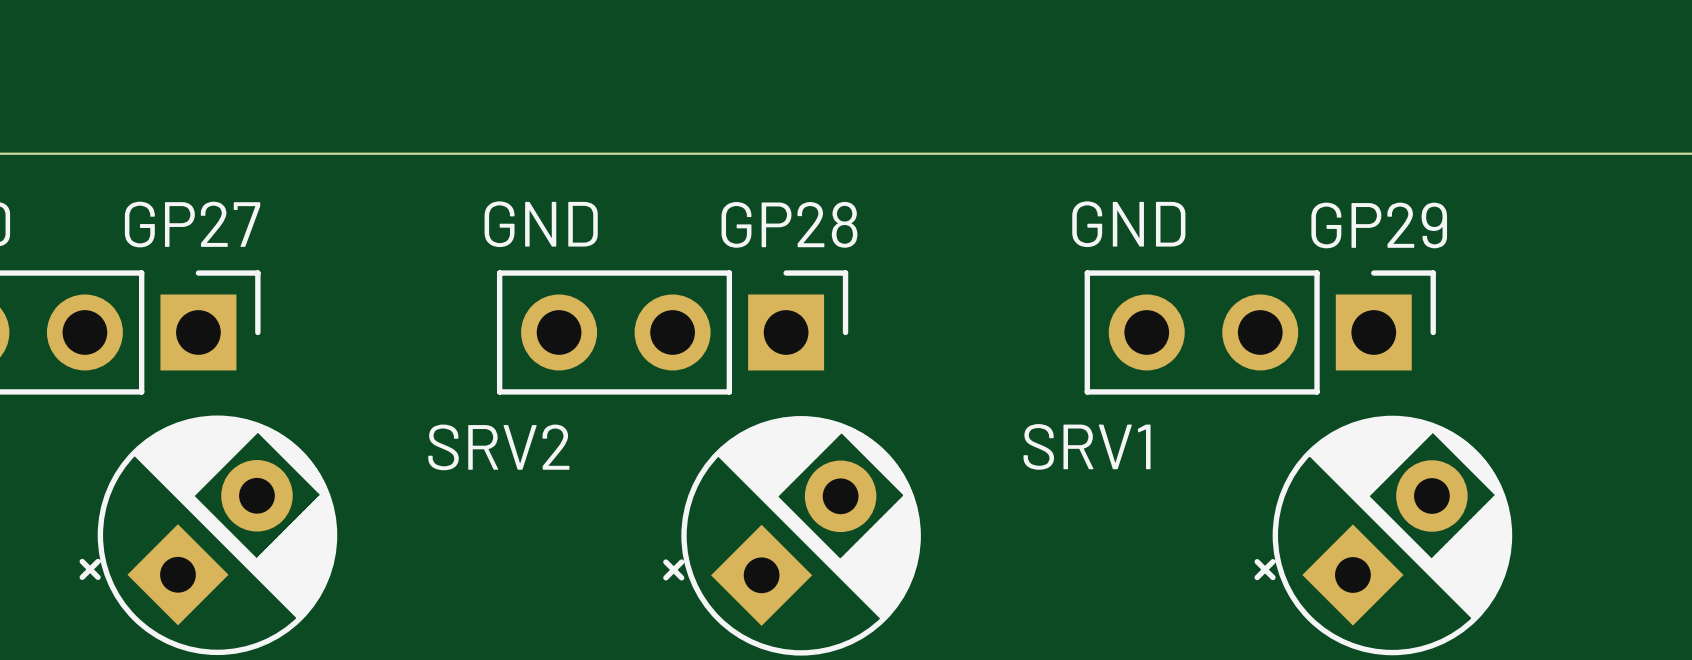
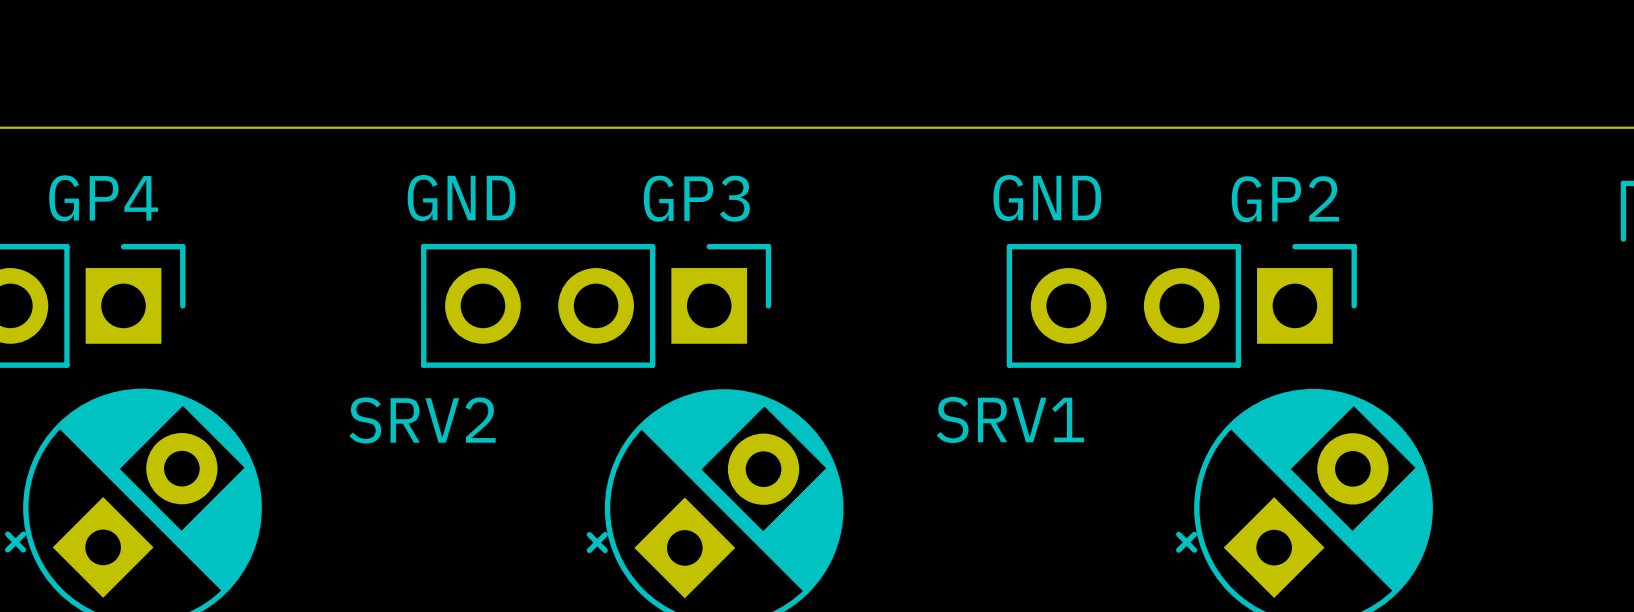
text: GP27 (192, 224) -> GP4 (103, 198)
text: GP28 (789, 224) -> GP3 (696, 198)
text: GP29 (1379, 225) -> GP2 (1285, 199)

